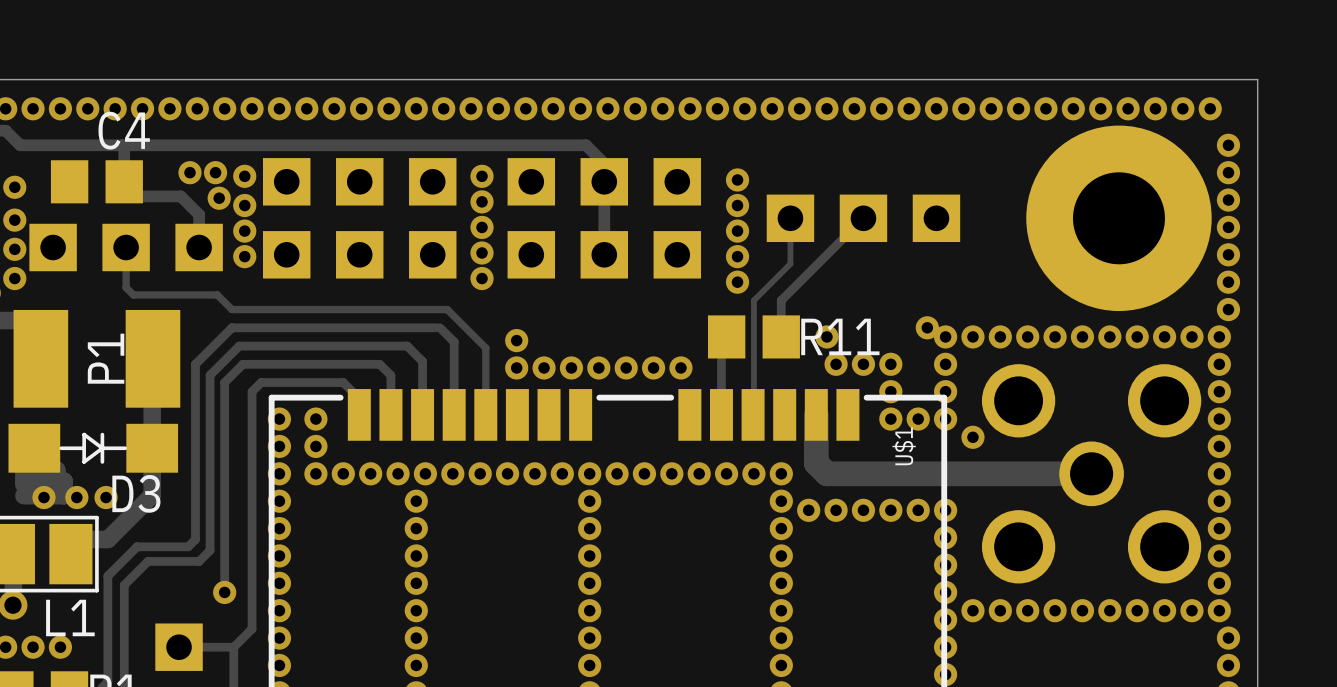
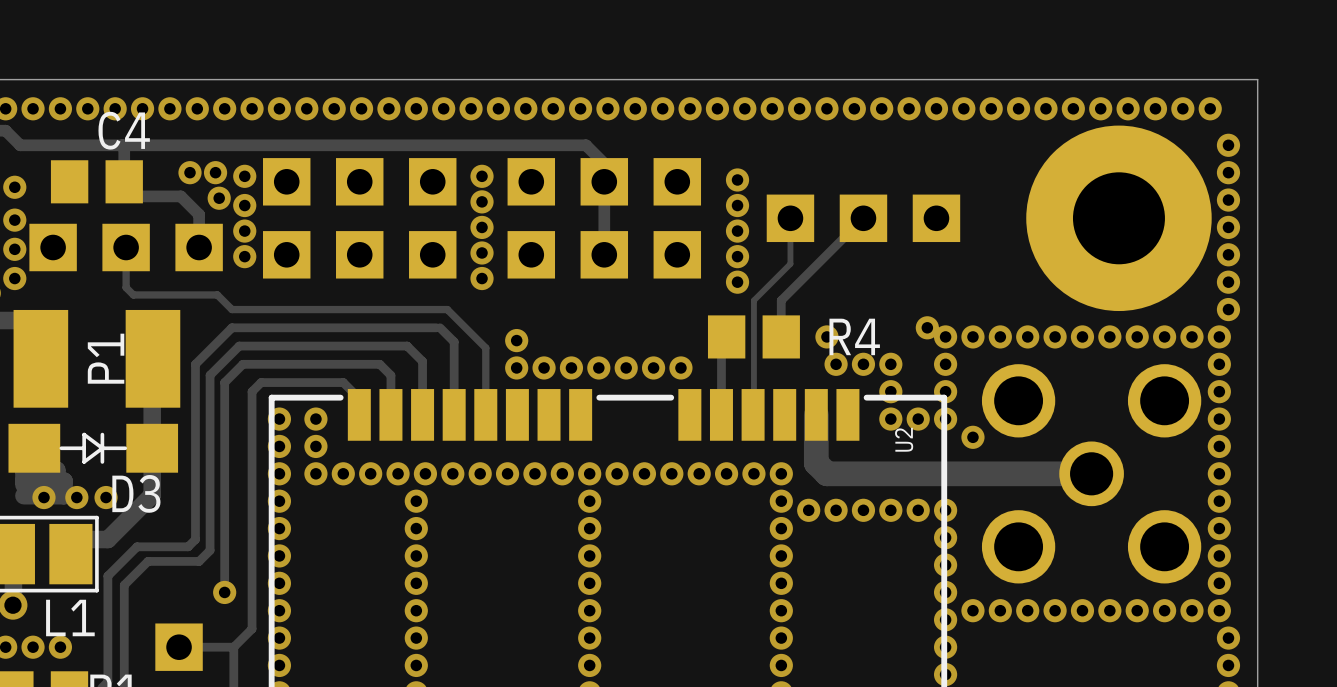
R11 name: R11 (840, 336) -> R4 (854, 336)
U$1 name: U$1 (904, 446) -> U2 (904, 439)

